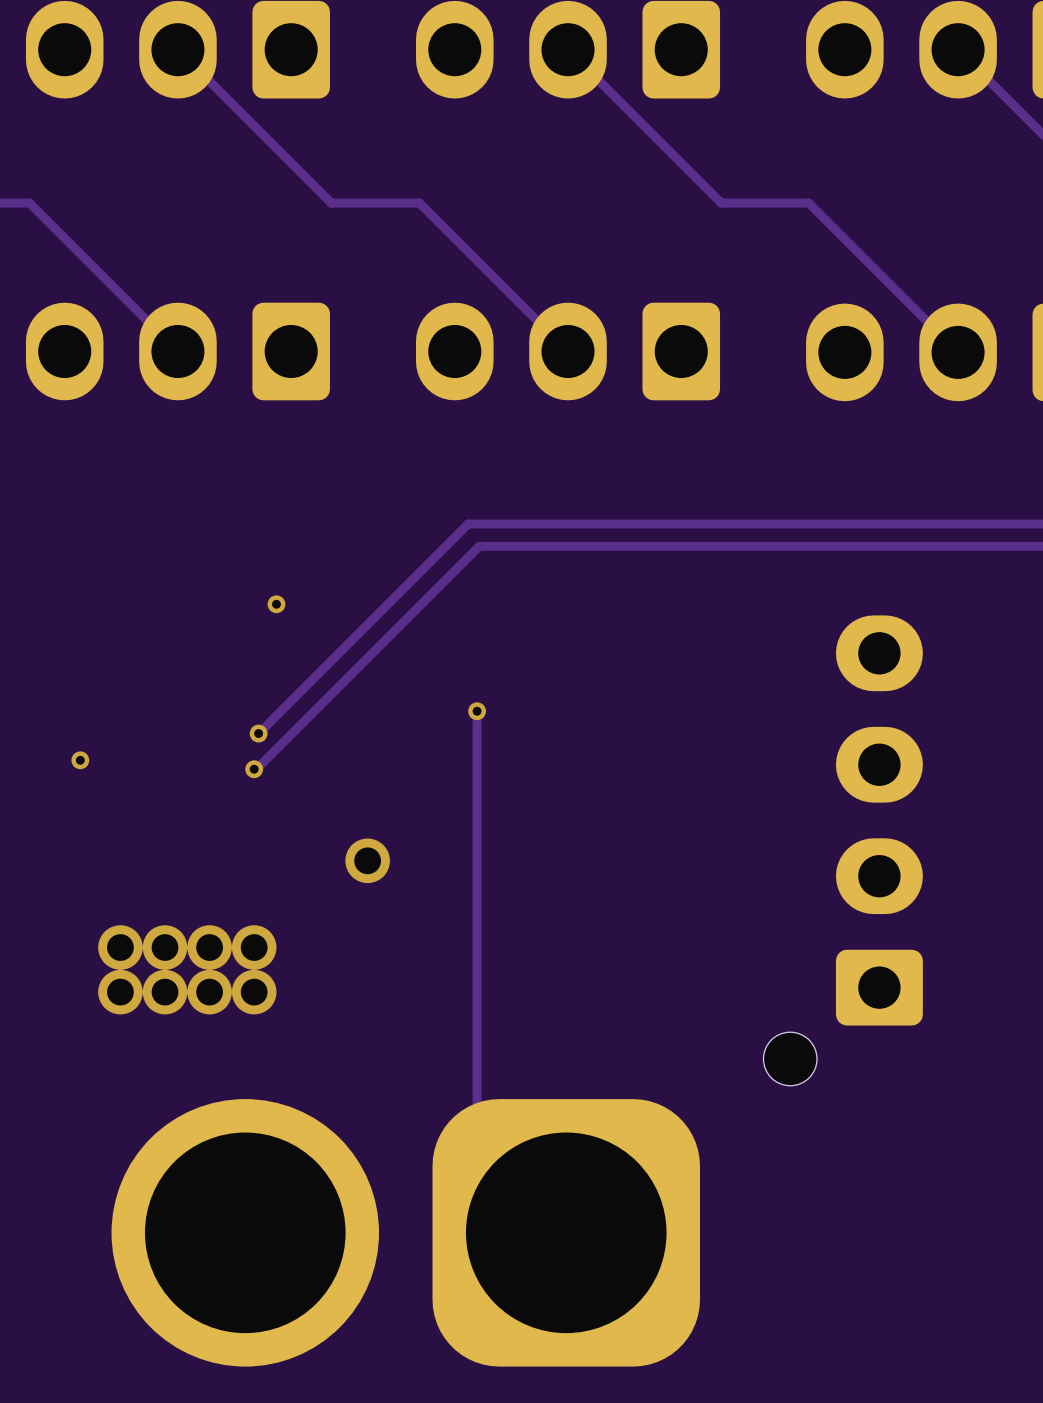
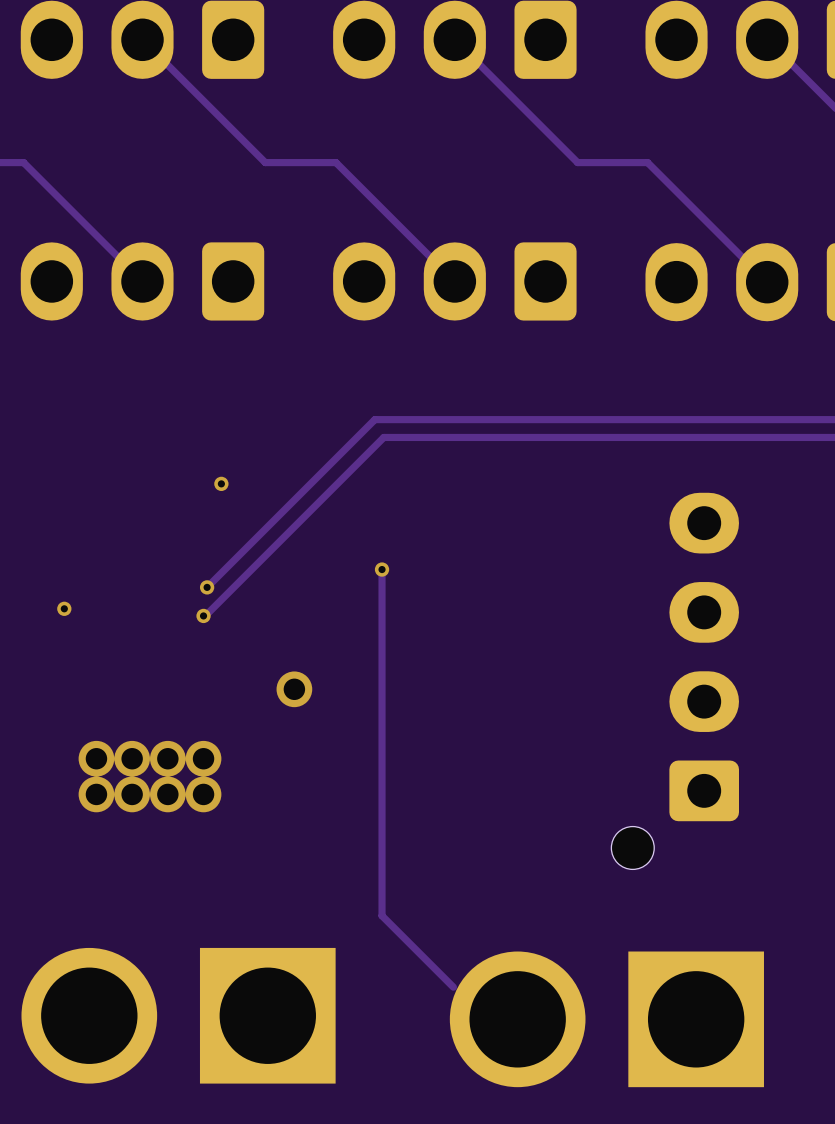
part: (405, 1232) -> none
part: none -> (178, 1015)
part: none -> (606, 1019)

